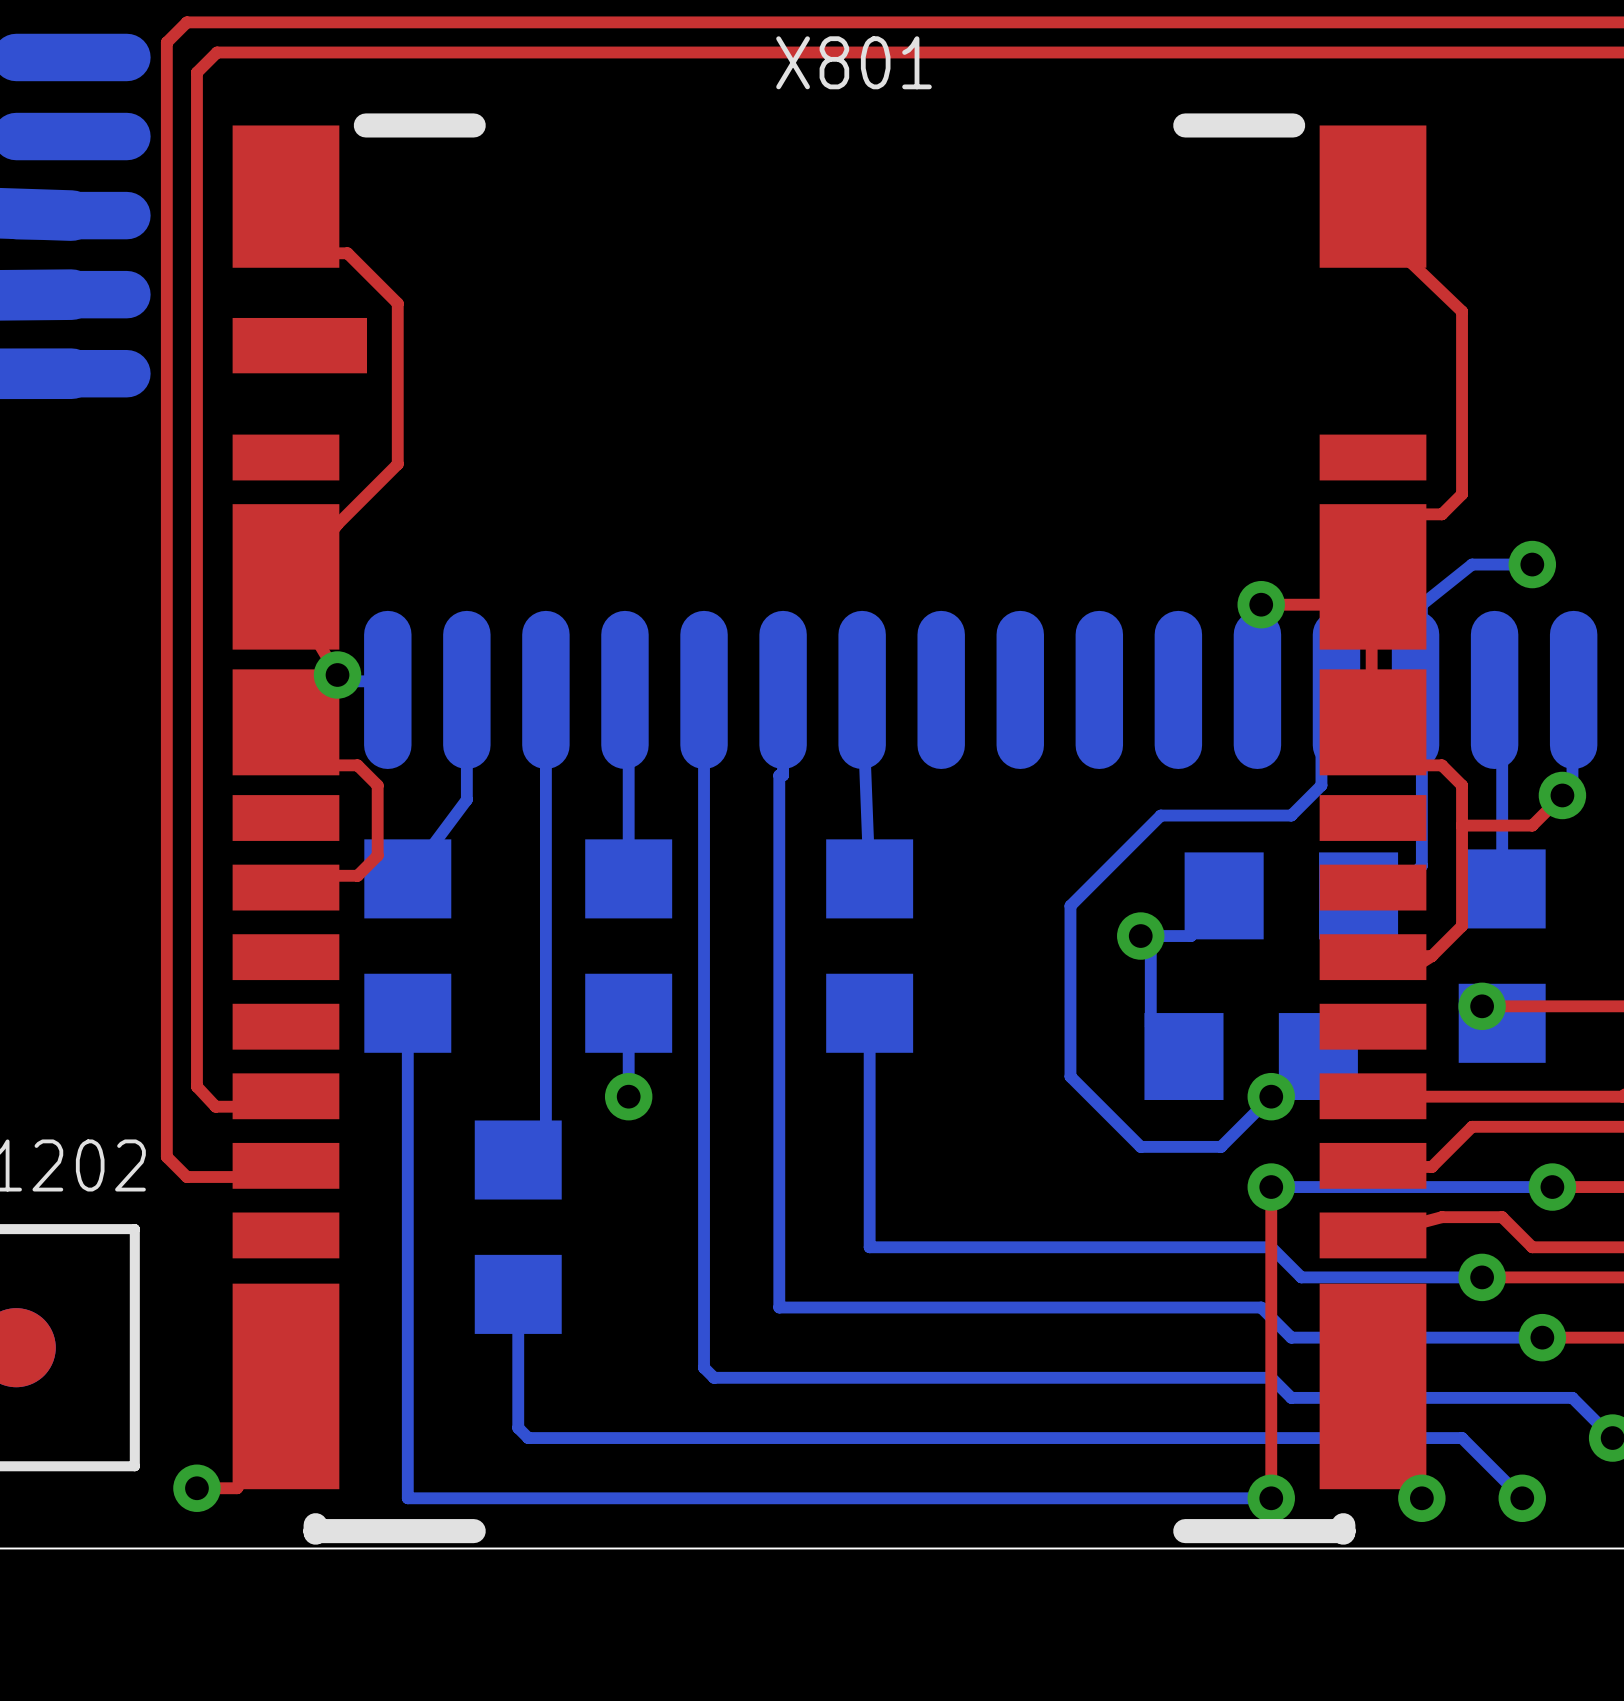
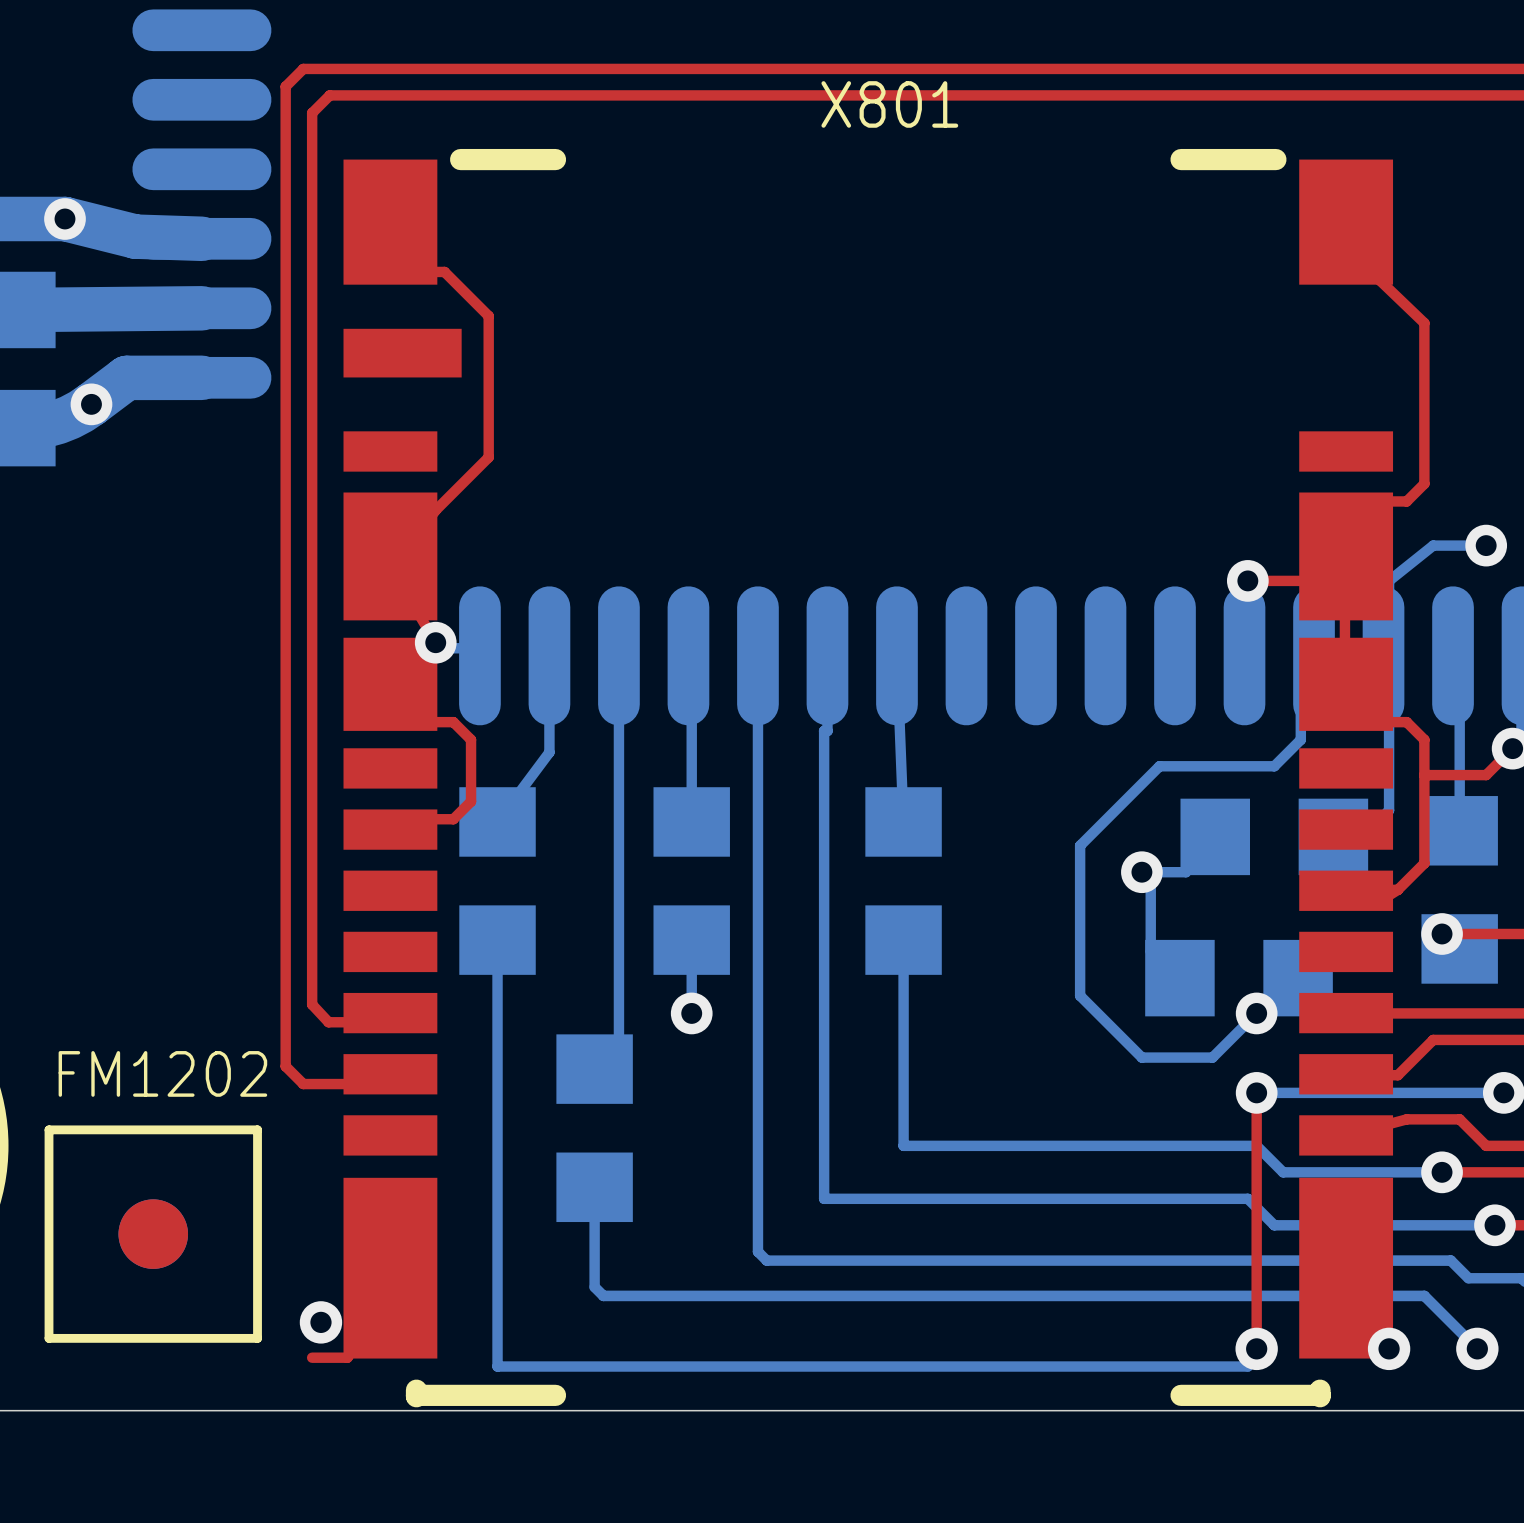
bottom track: (1271, 1377) (1291, 1397) (1512, 1397) -> (1256, 1260) (1450, 1260) (1468, 1278)
bottom track: (518, 1407) (518, 1428) (528, 1438) (1462, 1438) (1522, 1498) -> (594, 1287) (603, 1295) (1424, 1295) (1477, 1348)
via position: (196, 1488) -> (320, 1322)
via position: (1271, 1498) -> (1256, 1348)
via position: (1421, 1498) -> (1389, 1348)
via position: (1522, 1498) -> (1477, 1348)

